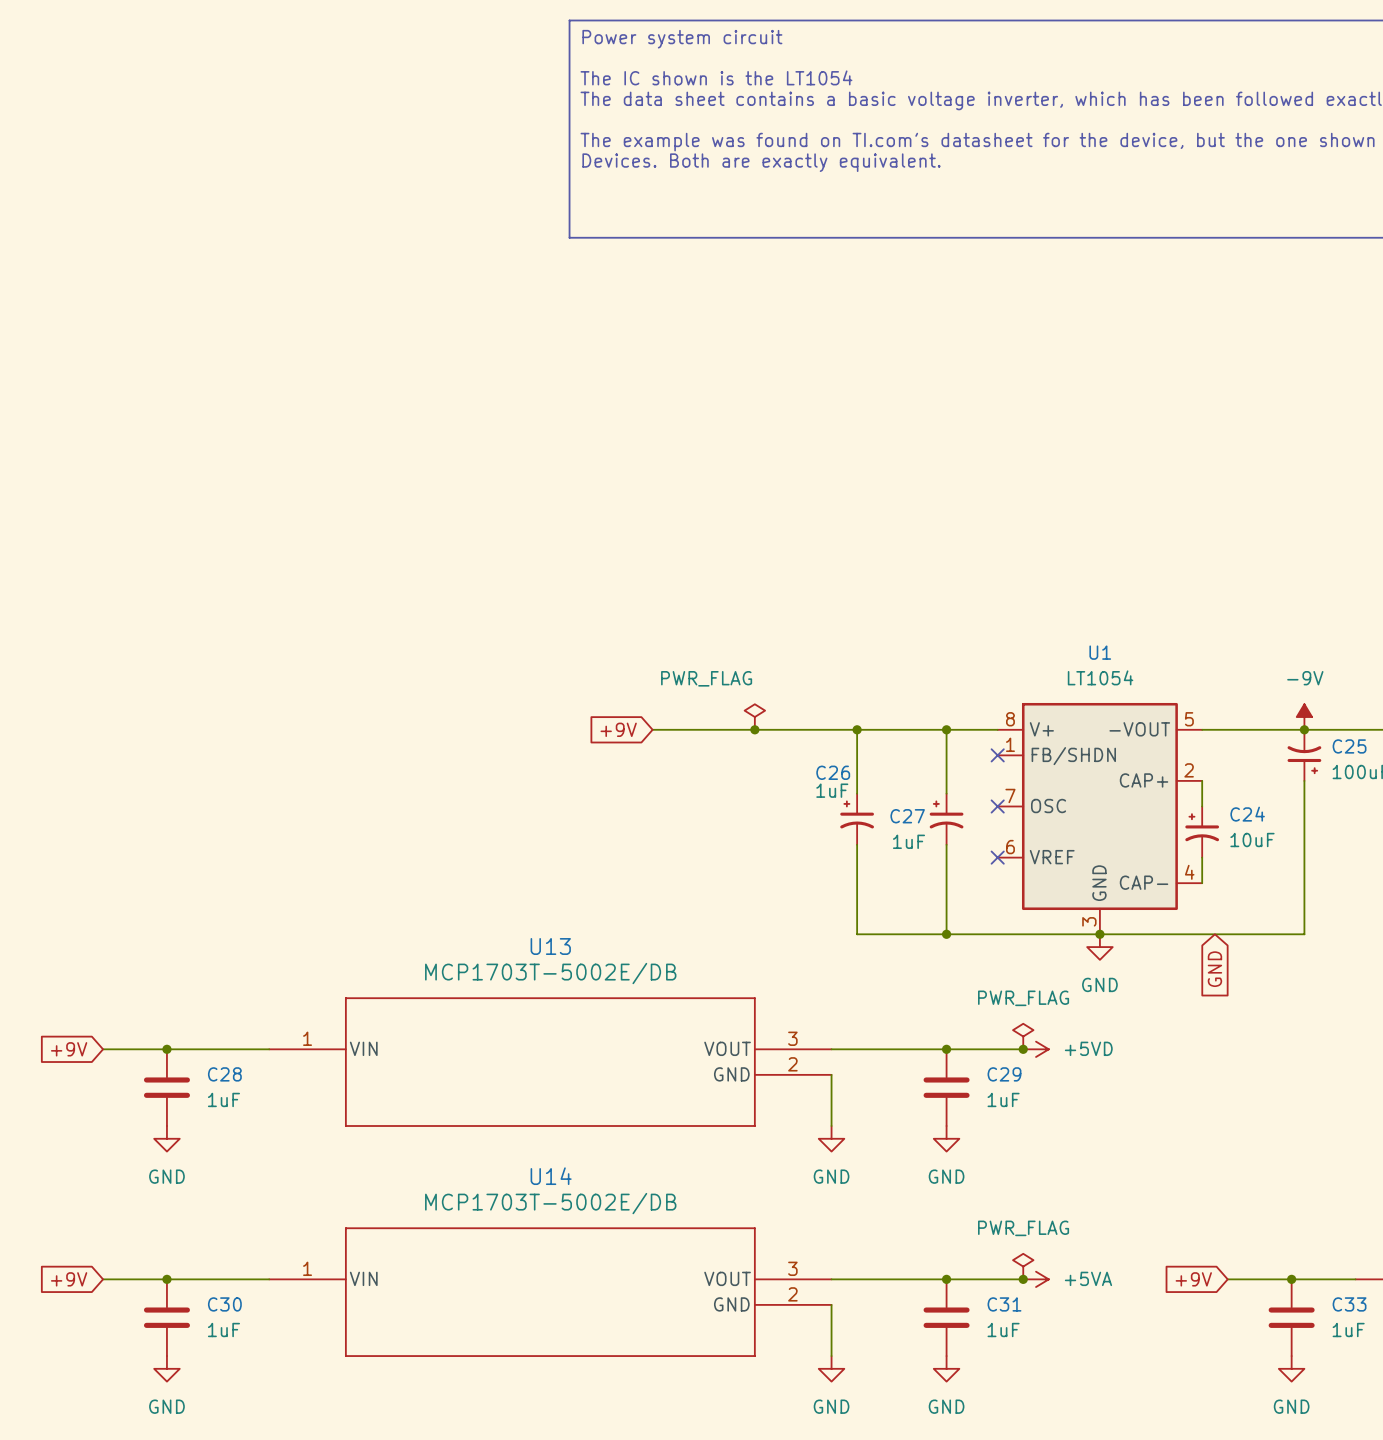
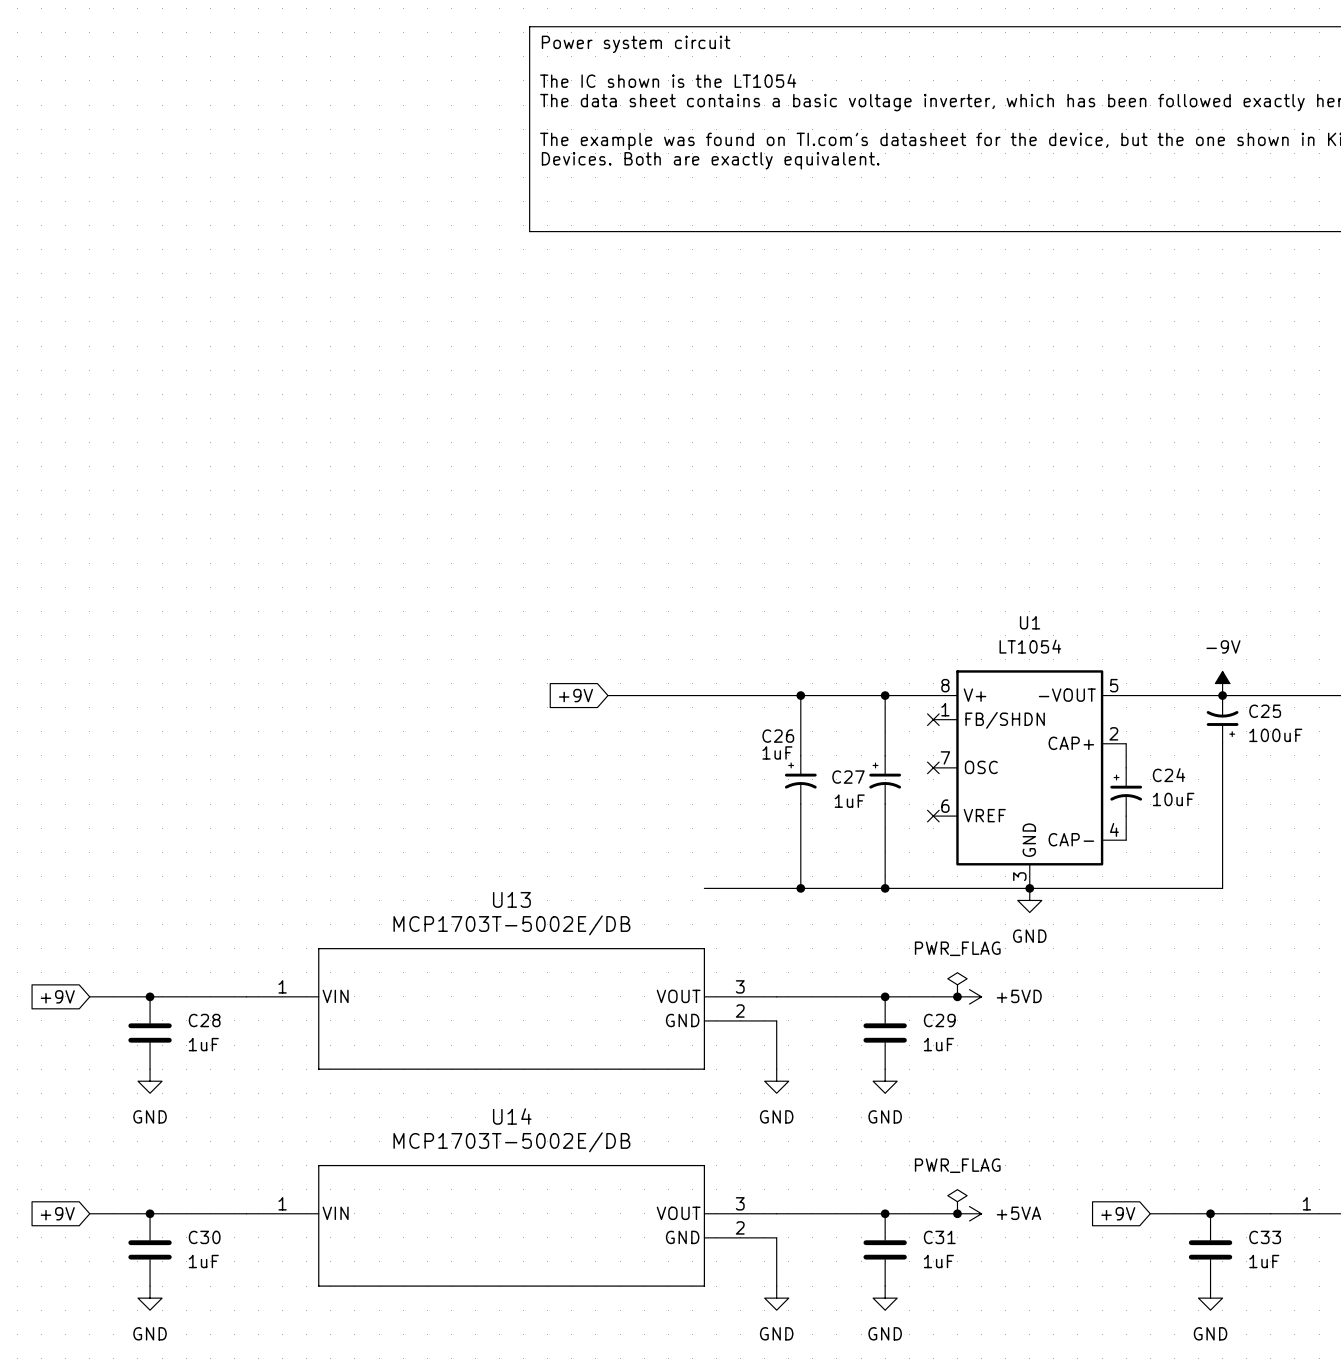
power symbol: PWR_FLAG (754, 717) -> none
junction: (754, 729) -> none
wire: none -> (704, 888) (800, 888)
junction: none -> (800, 888)
global label: GND (1214, 969) -> none

